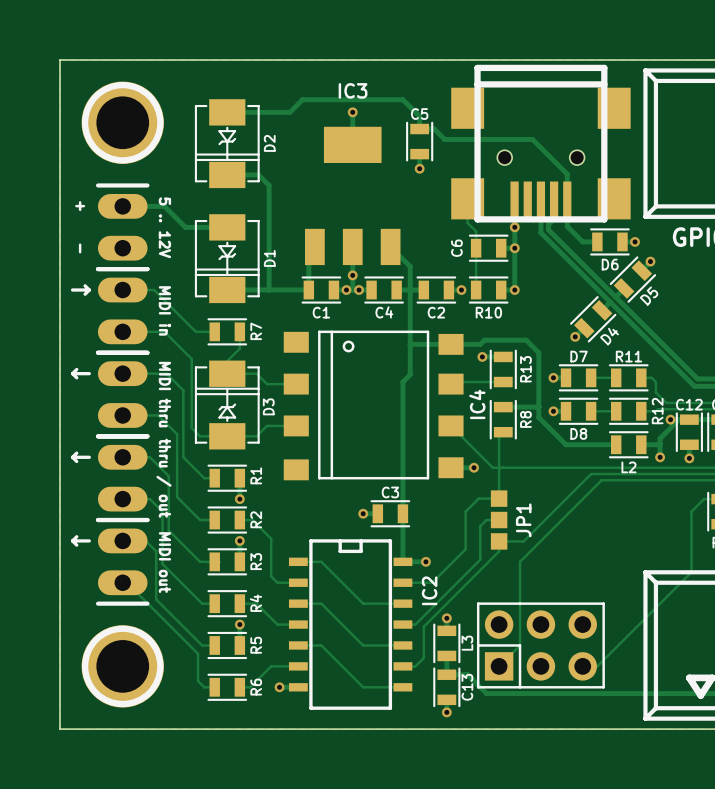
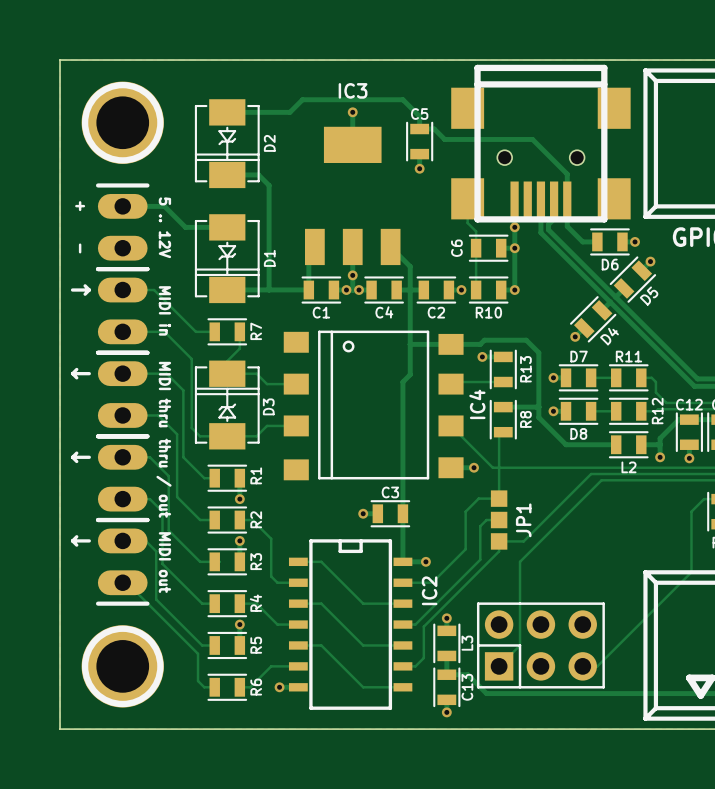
via: (670, 419) -> none

